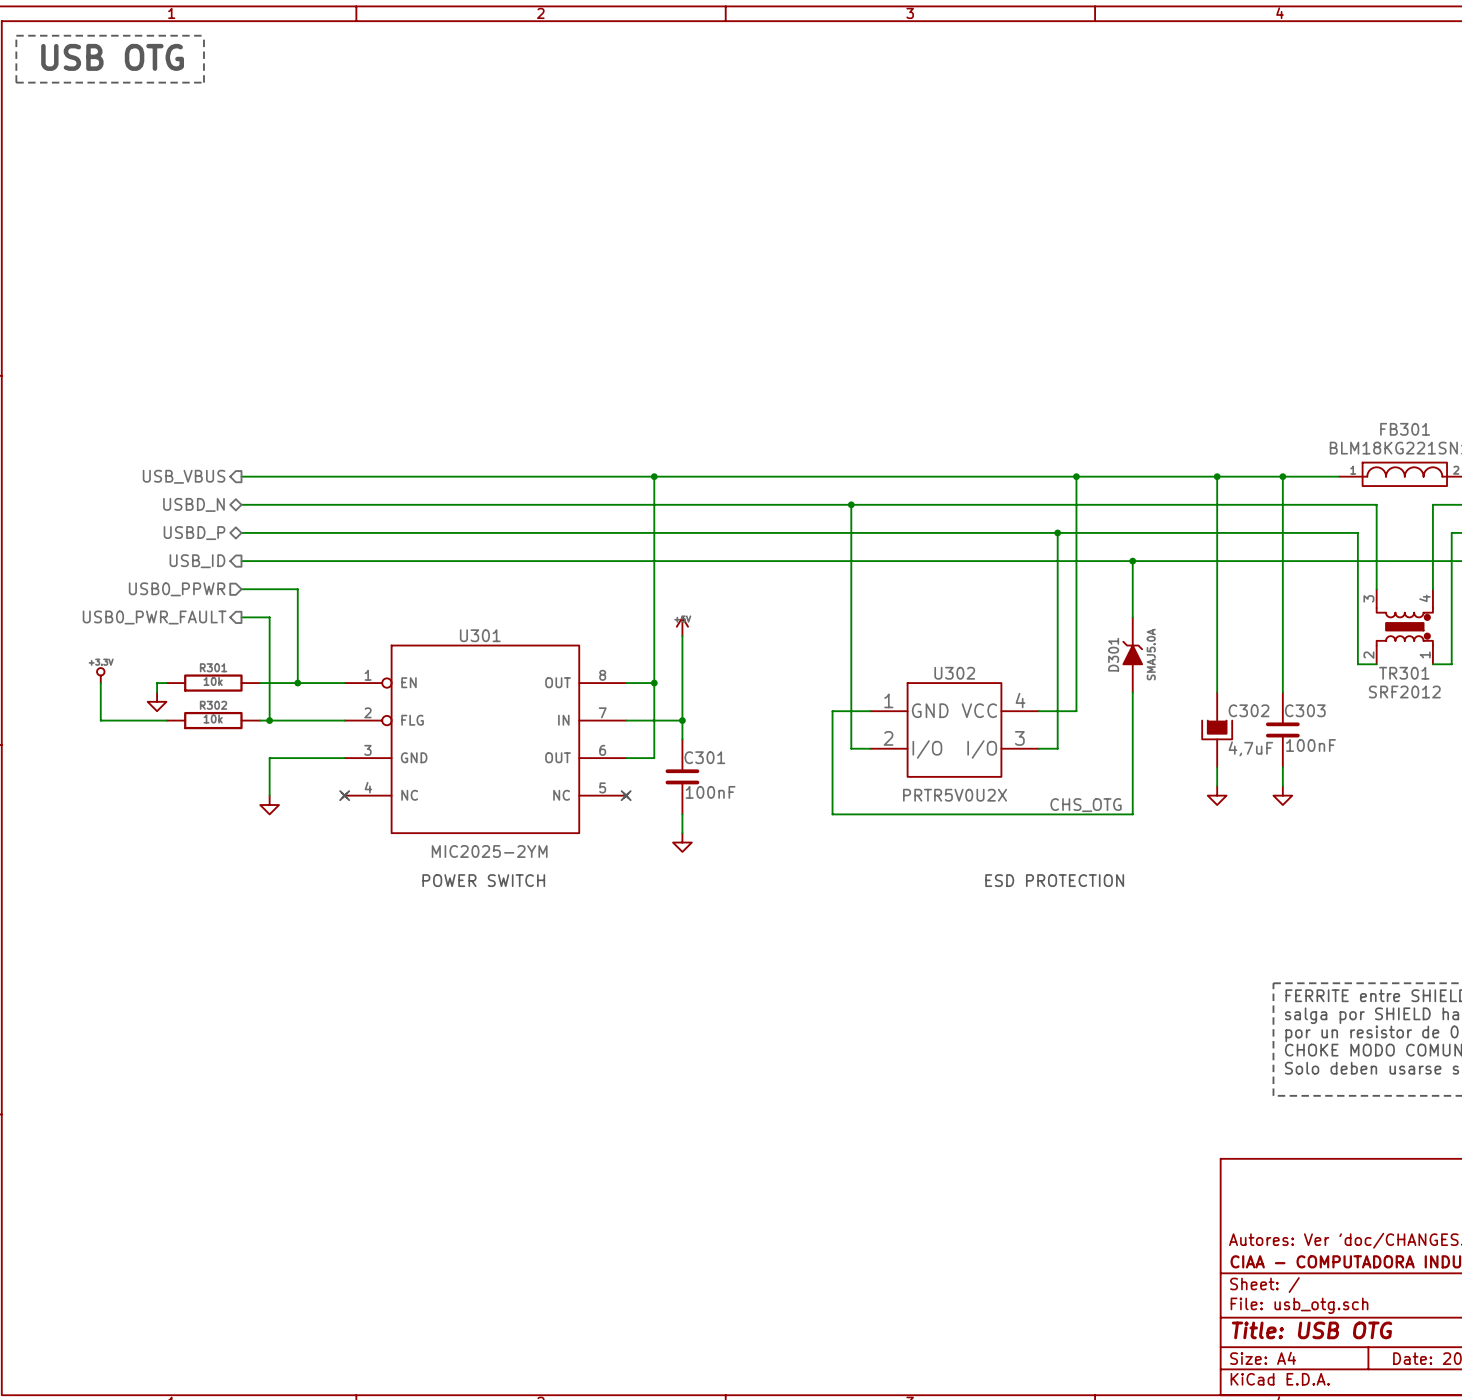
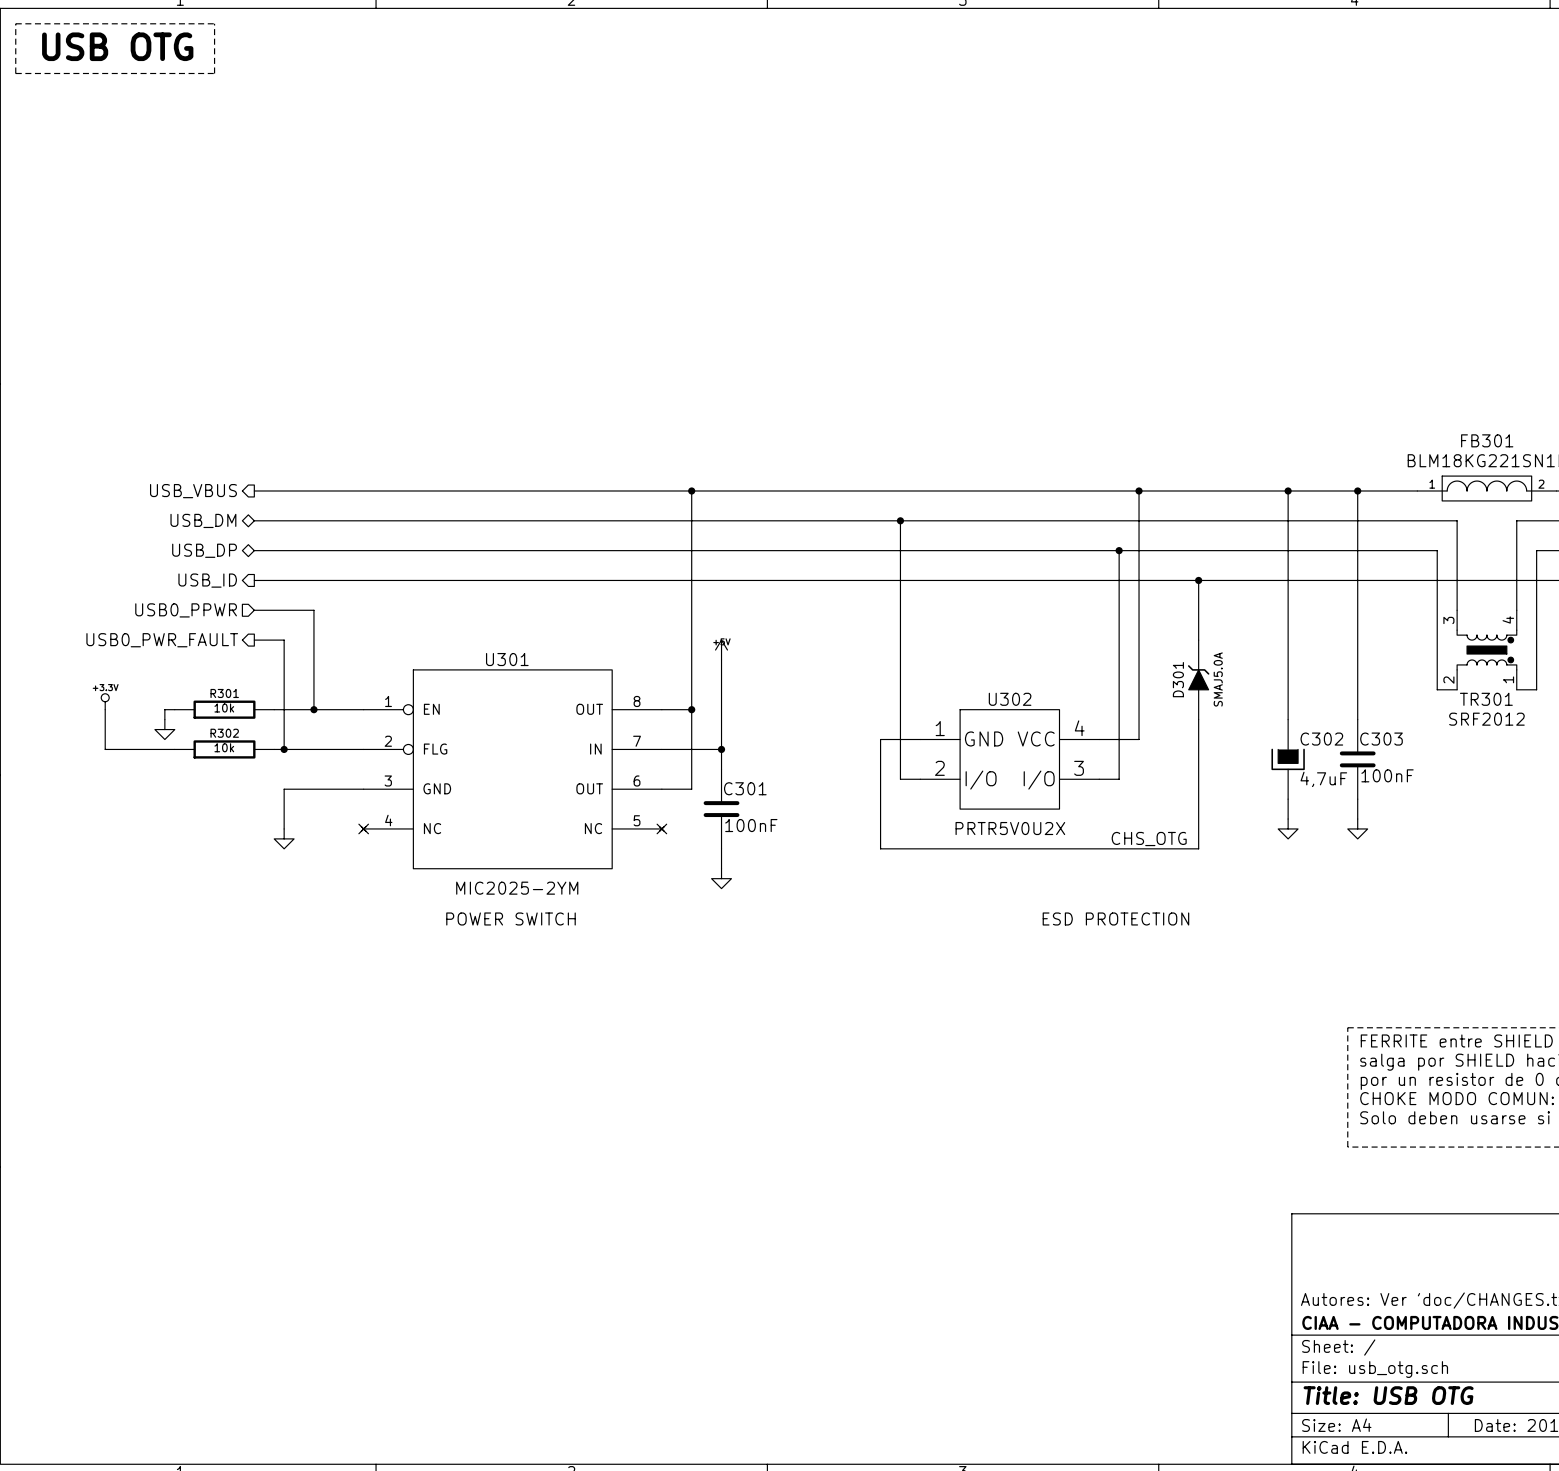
hierarchical label: USBD_N (193, 504) -> USB_DM (203, 520)
hierarchical label: USBD_P (194, 533) -> USB_DP (204, 550)

